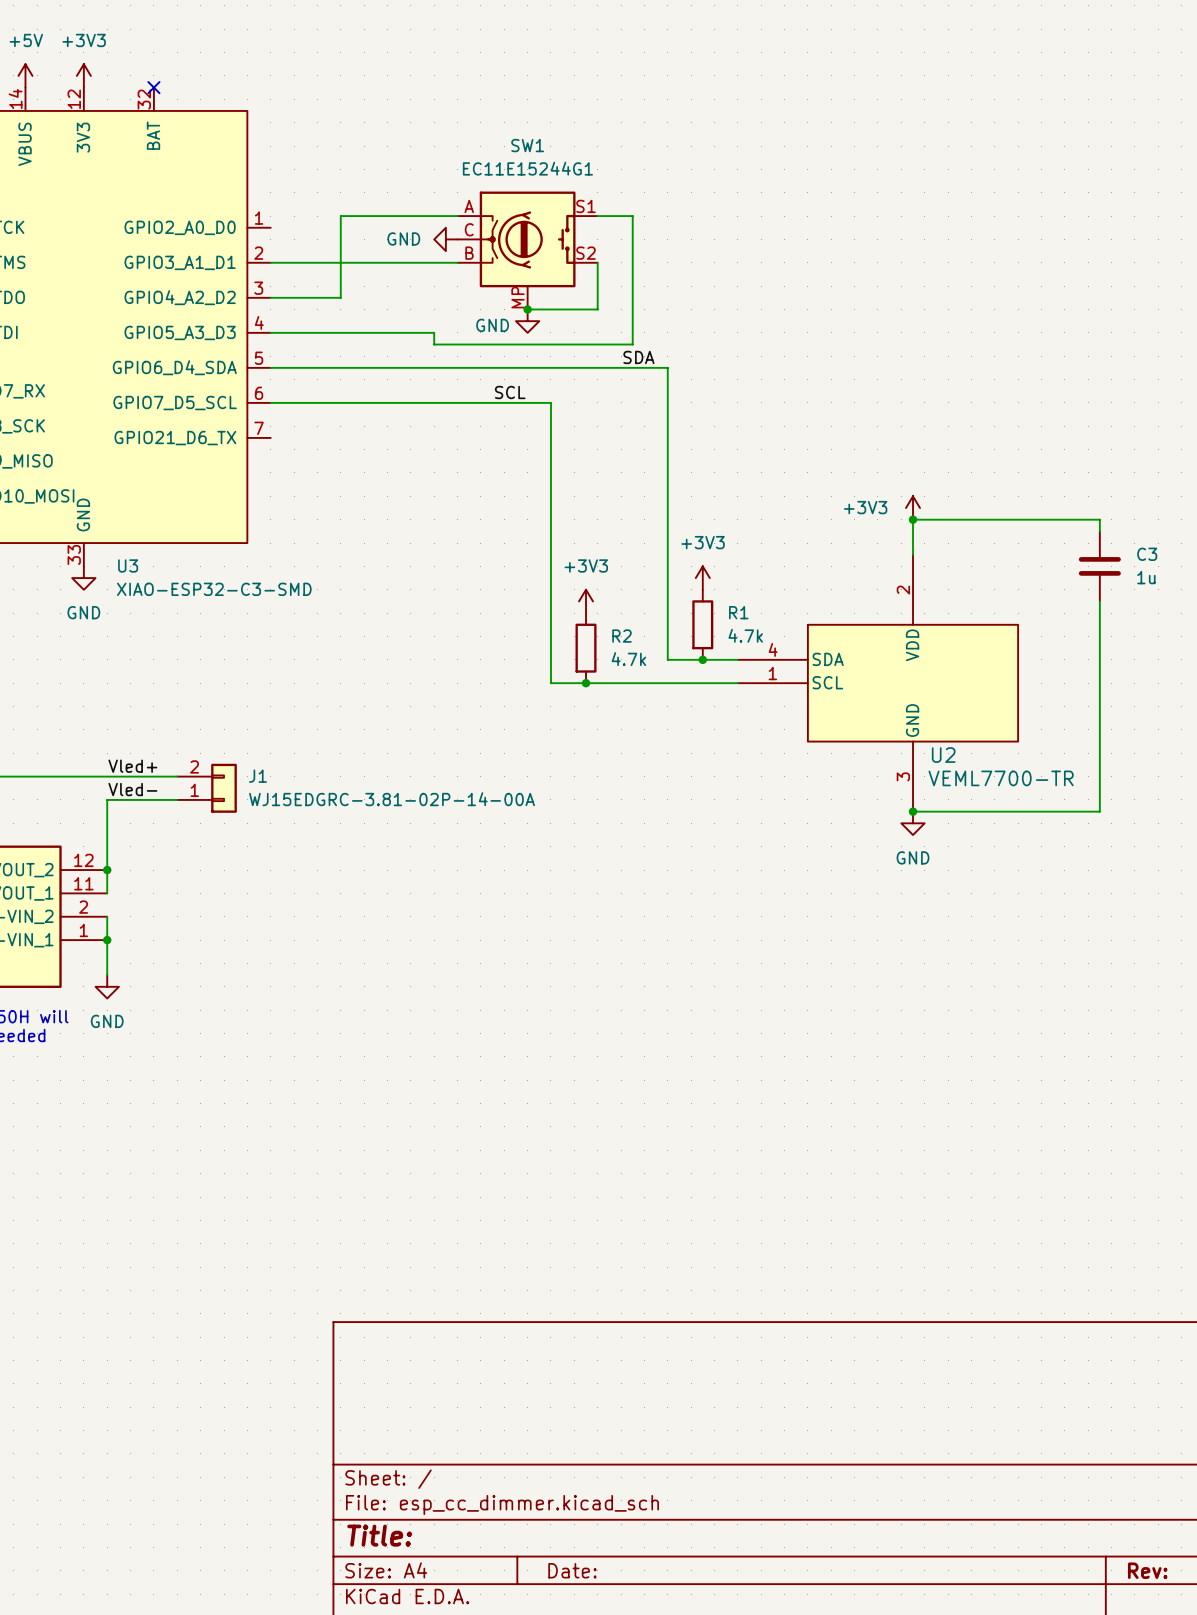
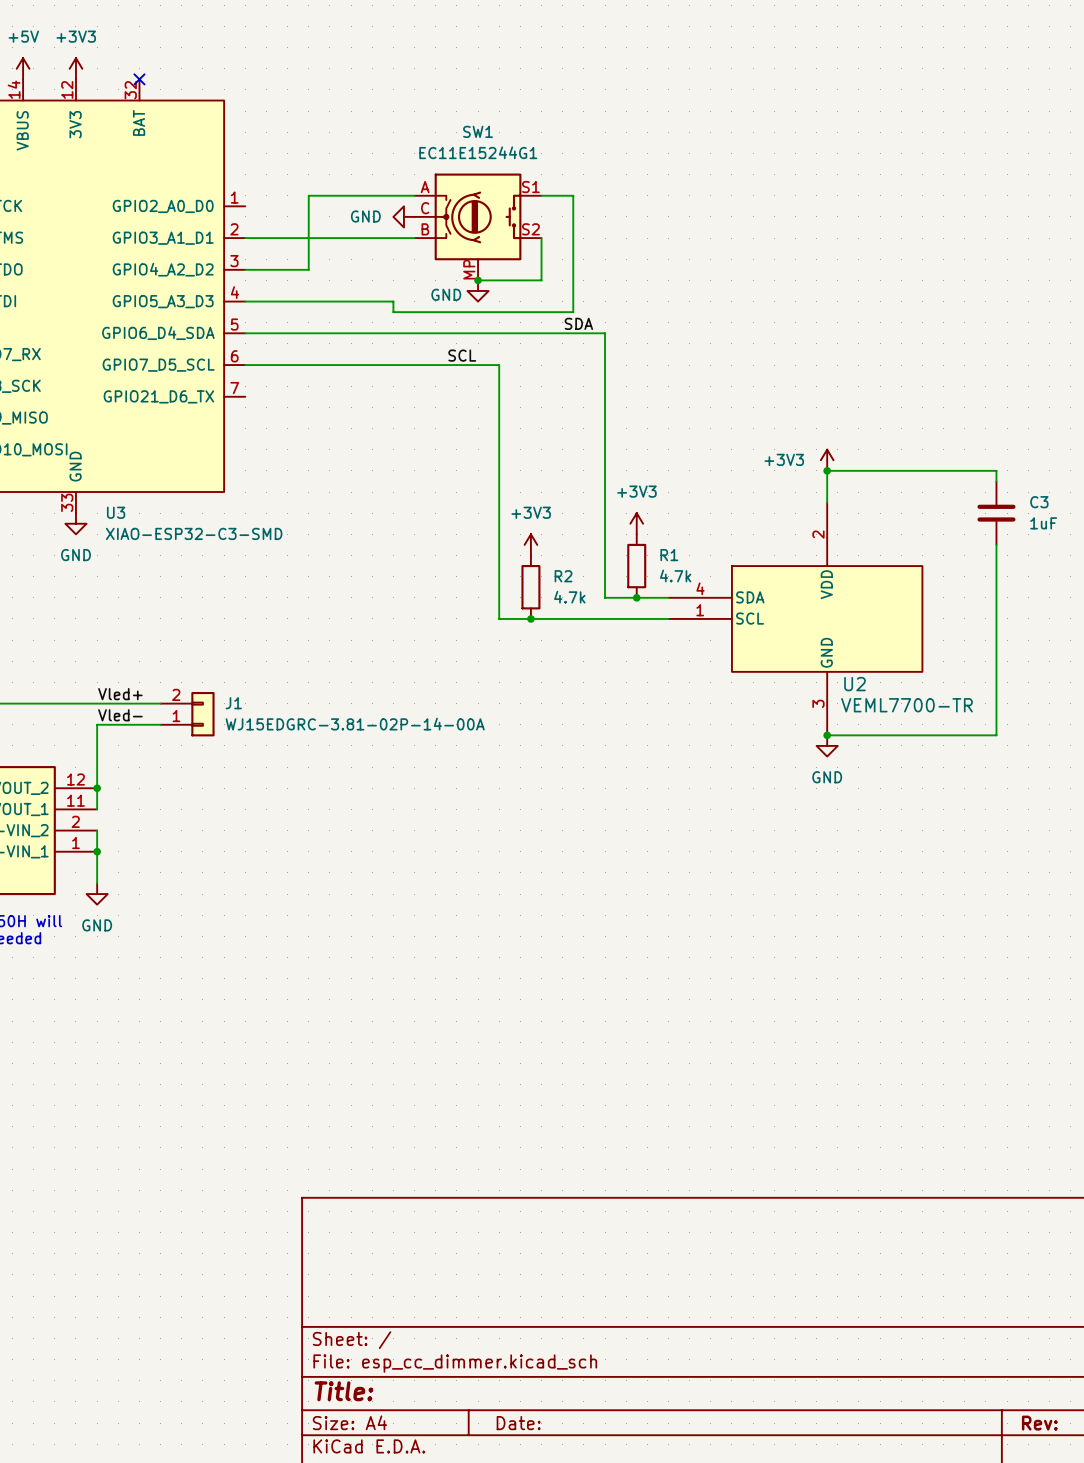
C3 value: 1u (1146, 577) -> 1uF (1043, 523)

